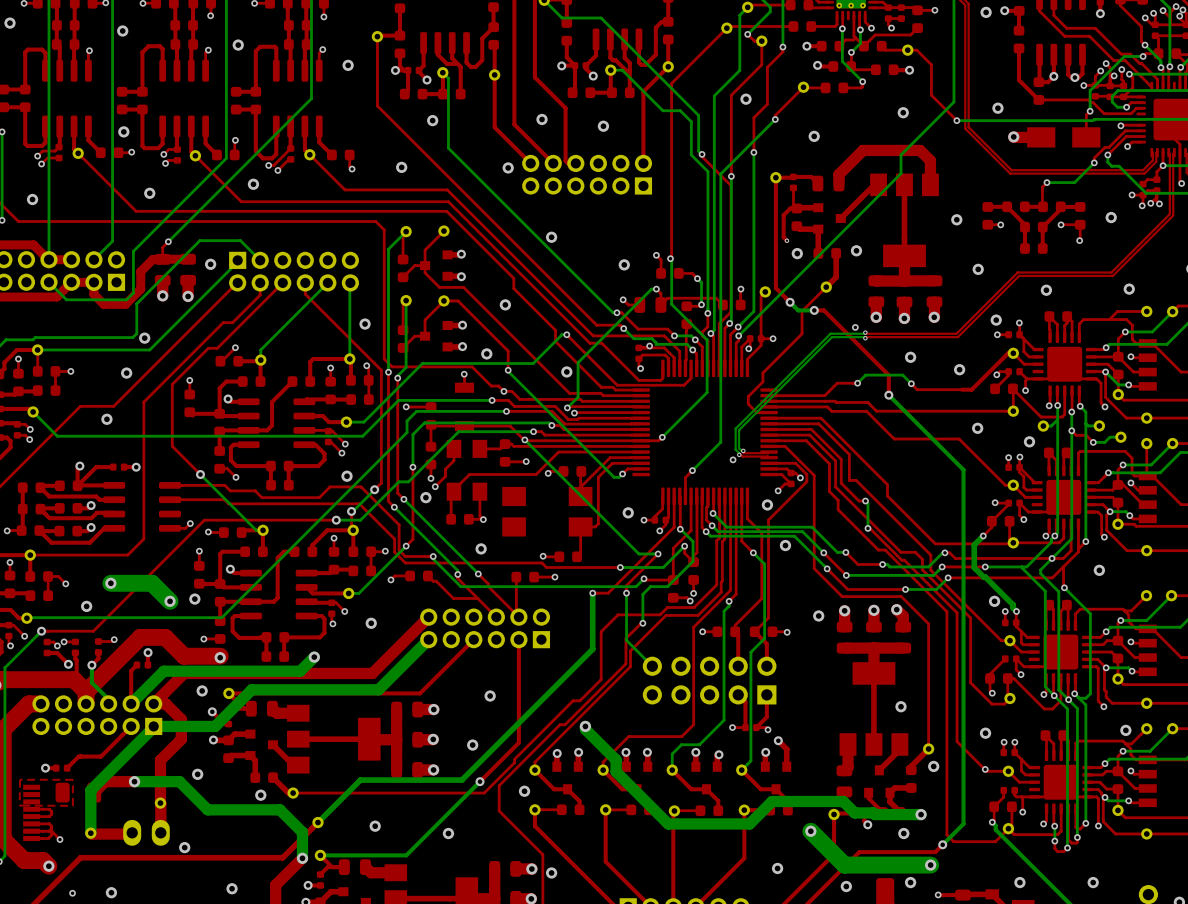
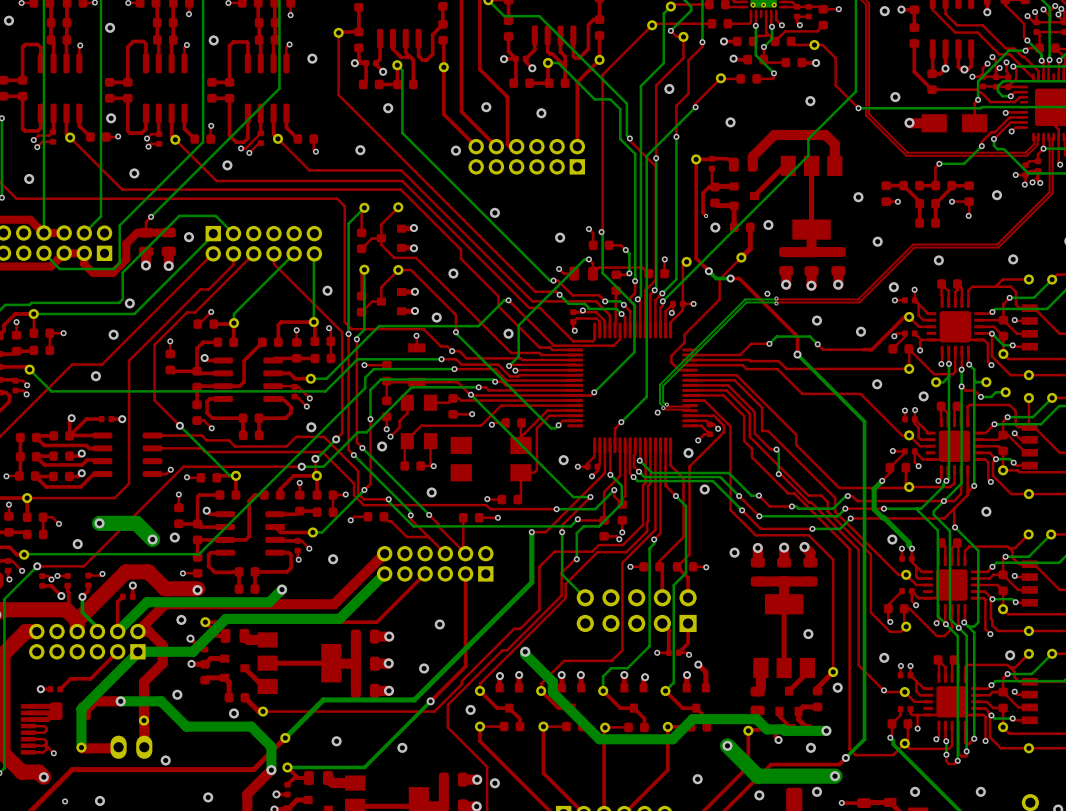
top track: none -> (28, 706) (51, 706) (56, 711)
top track: none -> (28, 712) (54, 712) (47, 719) (28, 719)
top zone outline: (22, 805) (72, 805) (72, 779) (20, 779) (19, 805) (22, 805) -> none

